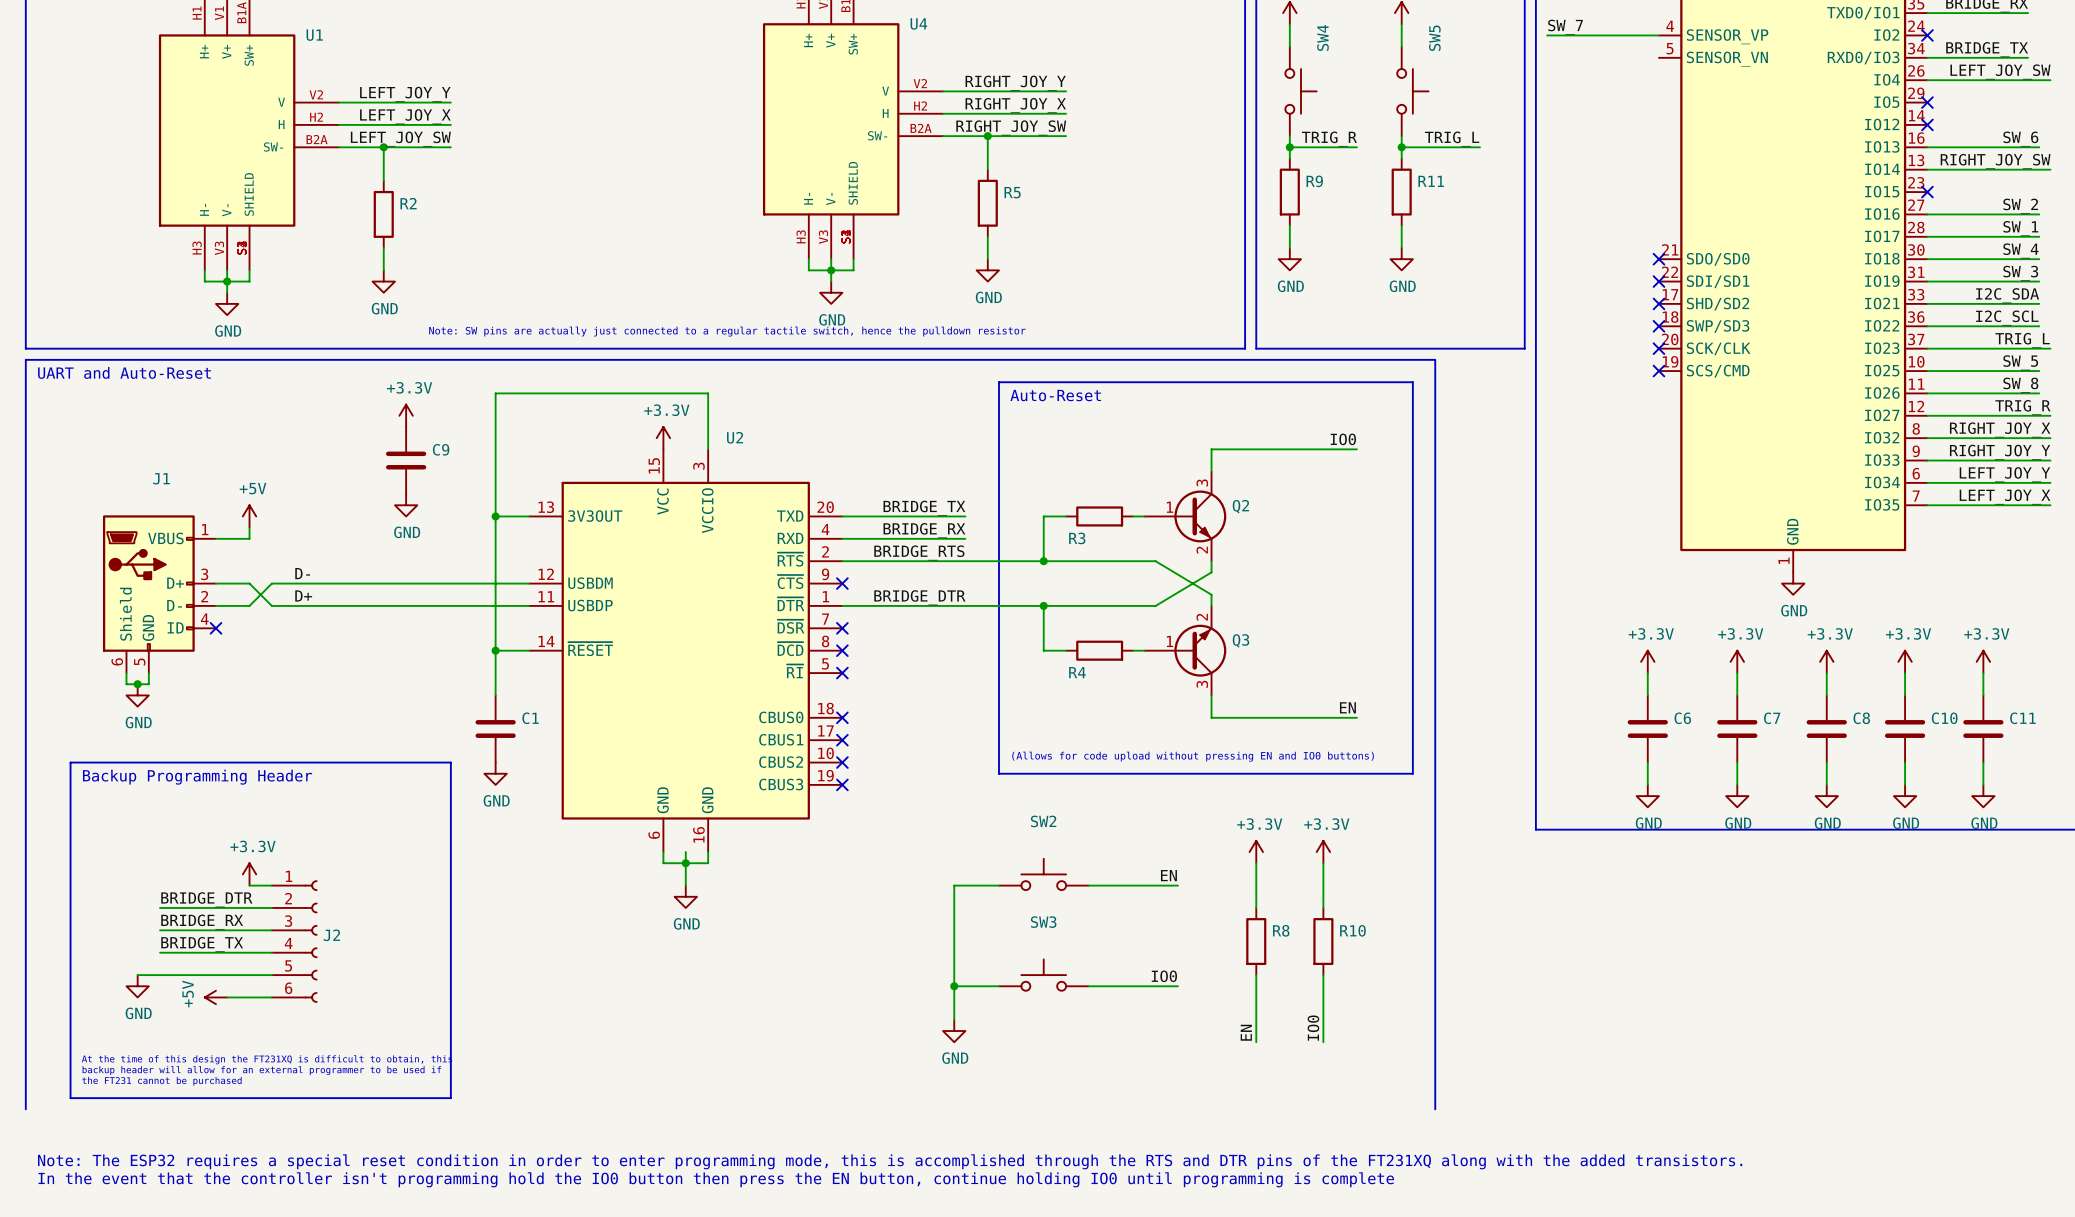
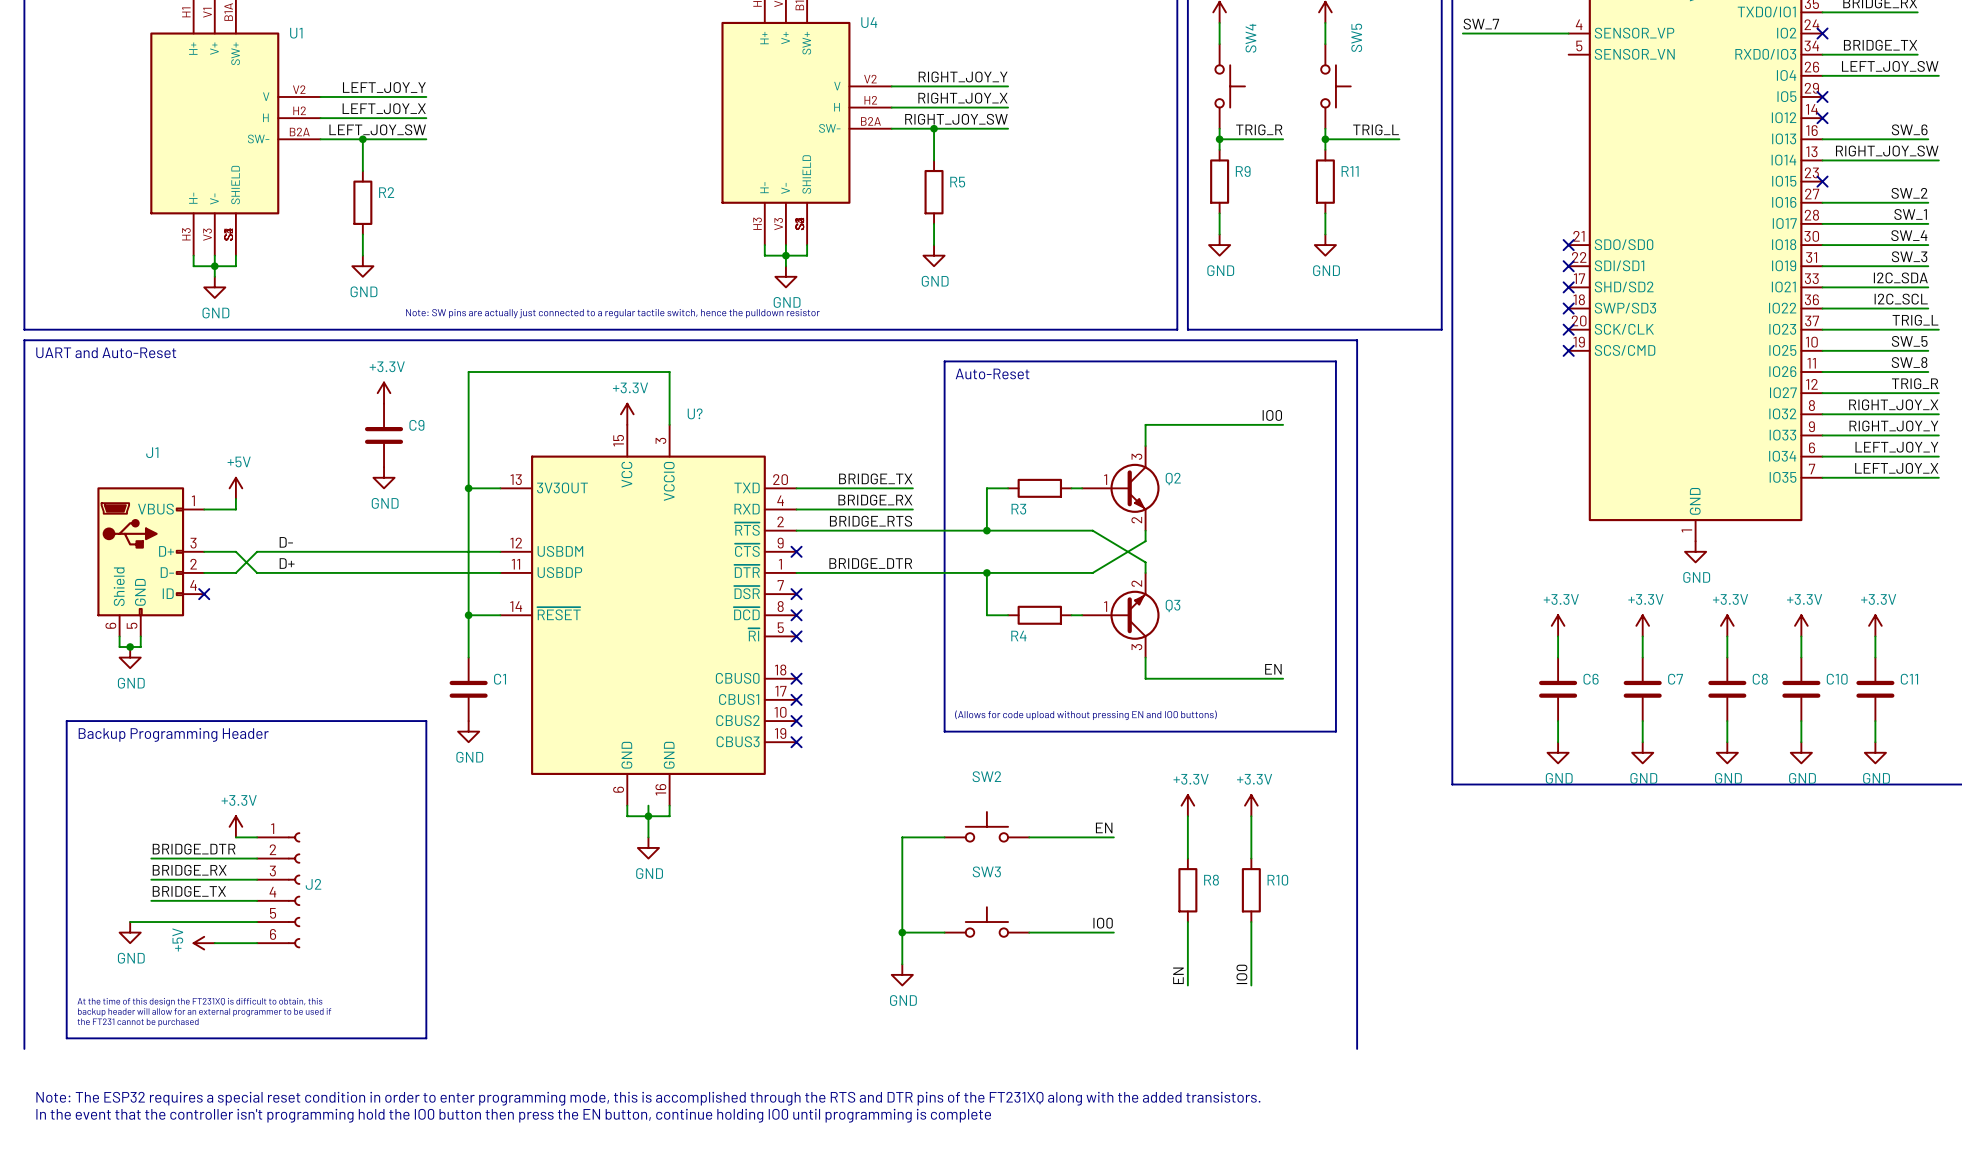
U2 name: U2 (735, 437) -> U? (695, 413)

